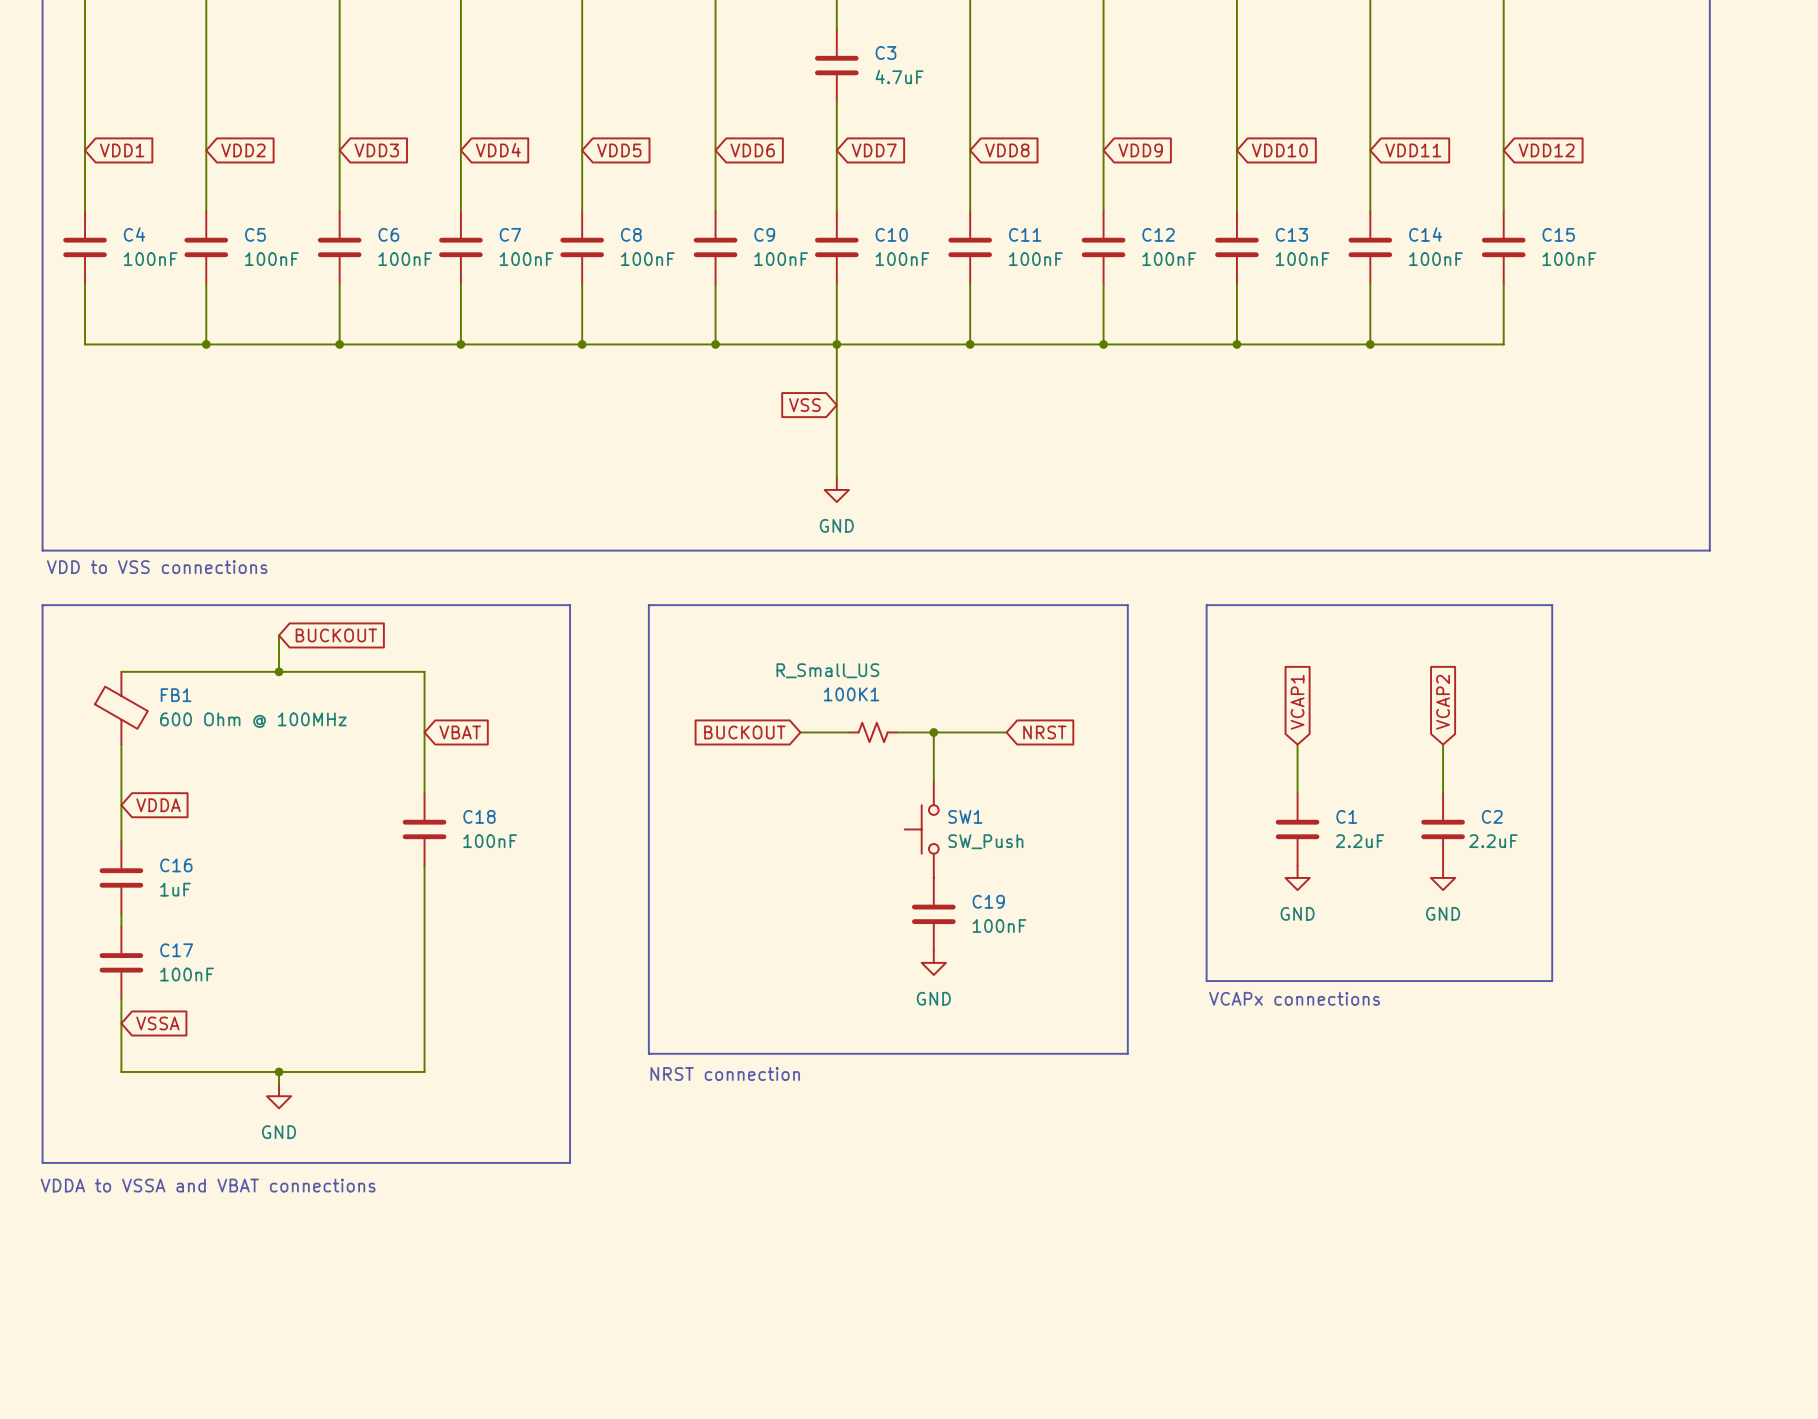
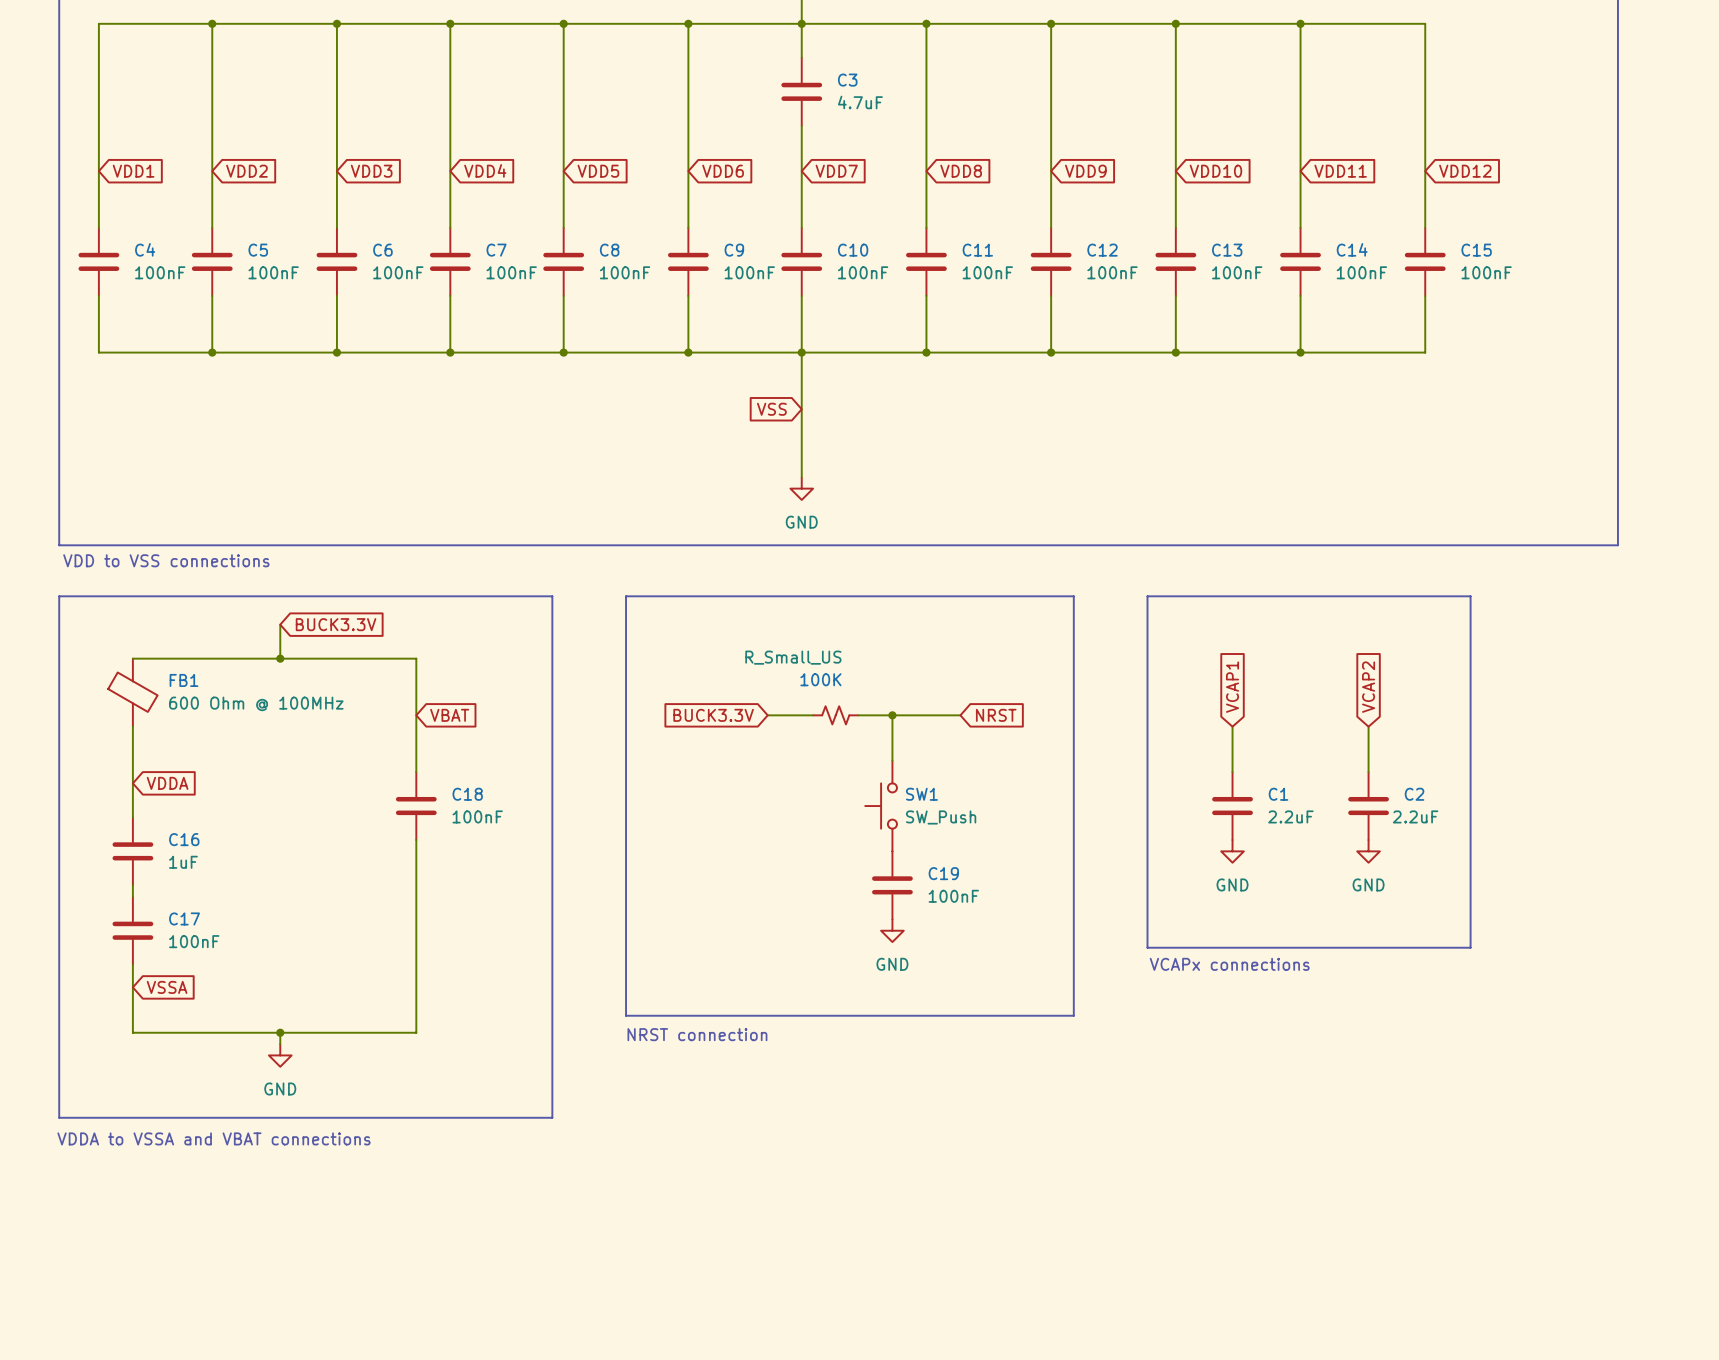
global label: BUCKOUT (336, 635) -> BUCK3.3V (336, 624)
100K1 name: 100K1 (851, 694) -> 100K (820, 679)
global label: BUCKOUT (744, 732) -> BUCK3.3V (713, 715)

